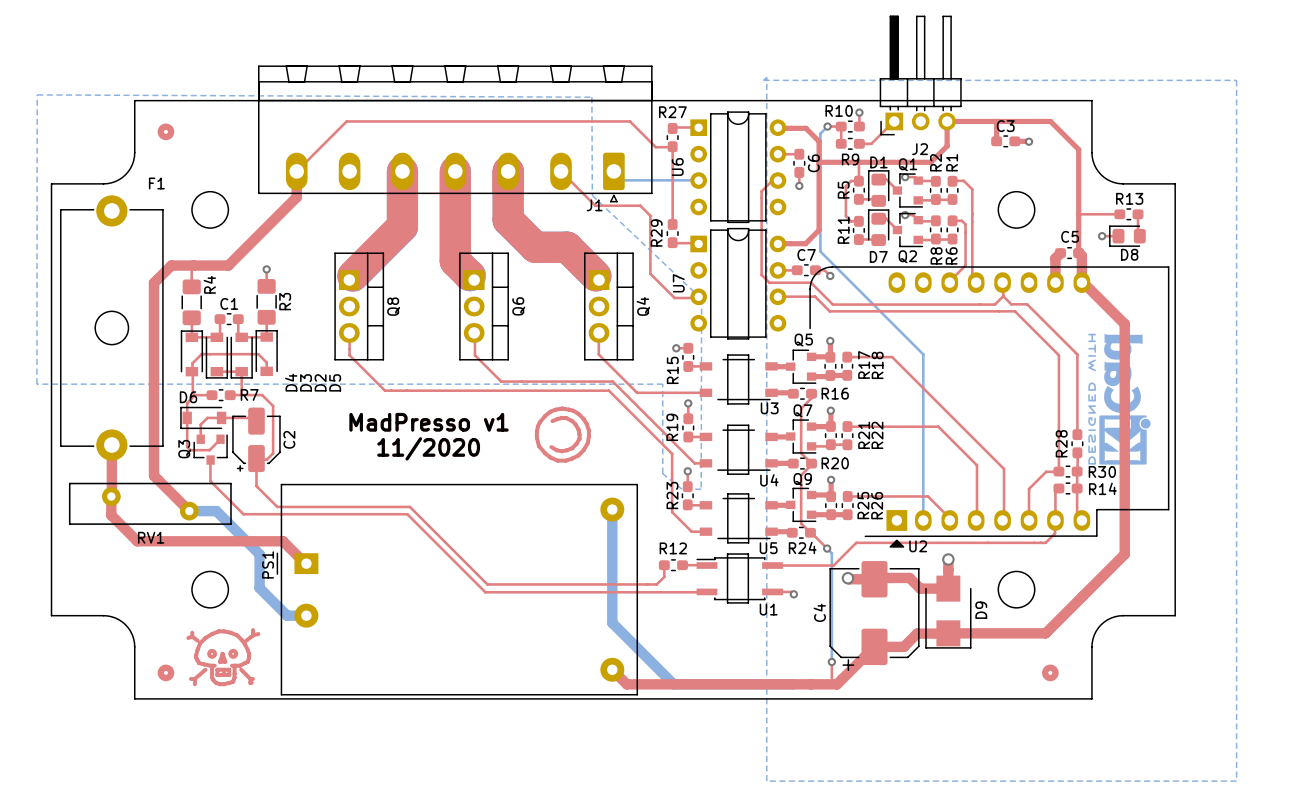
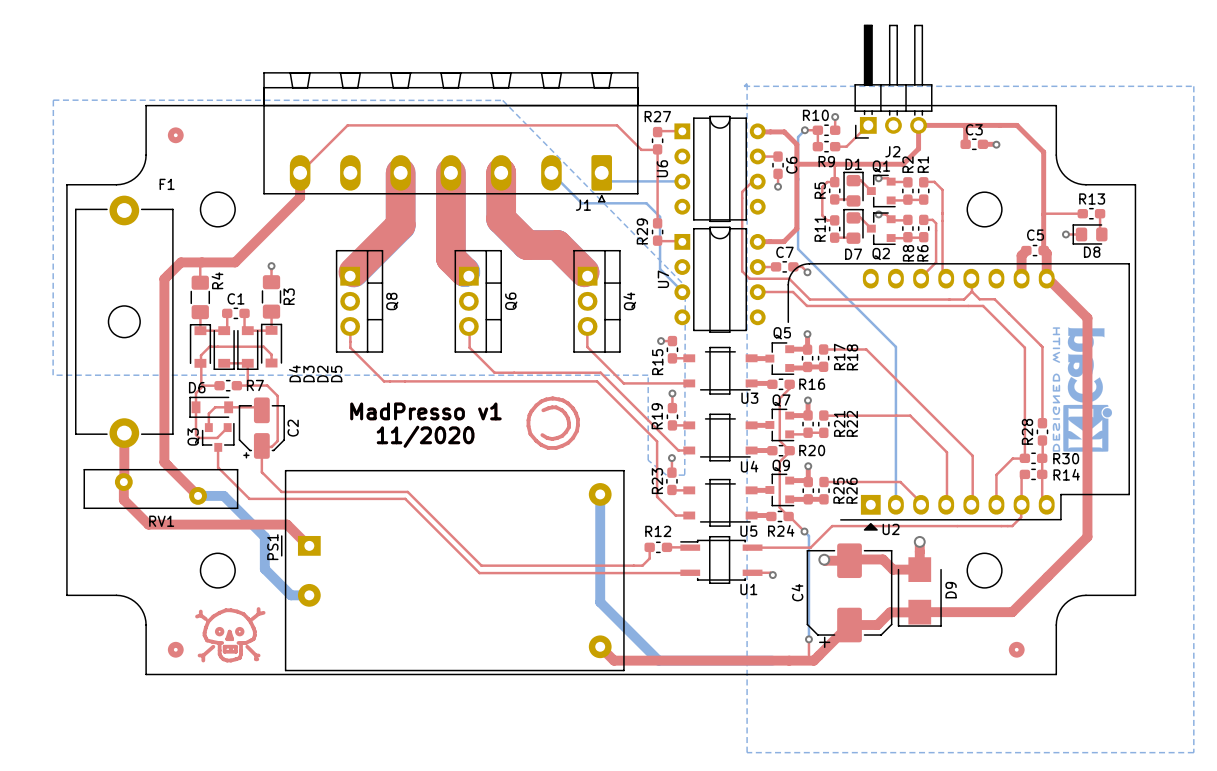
bottom zone outline: (37, 94) (591, 97) (592, 195) (701, 299) (701, 489) -> (53, 100) (502, 100) (685, 286) (684, 475)
top track: (561, 171) (595, 205) (640, 205) (650, 215) (650, 273) (674, 298) (698, 298) -> none
bottom track: none -> (551, 172) (581, 203) (646, 203) (660, 216) (660, 269) (682, 291)

